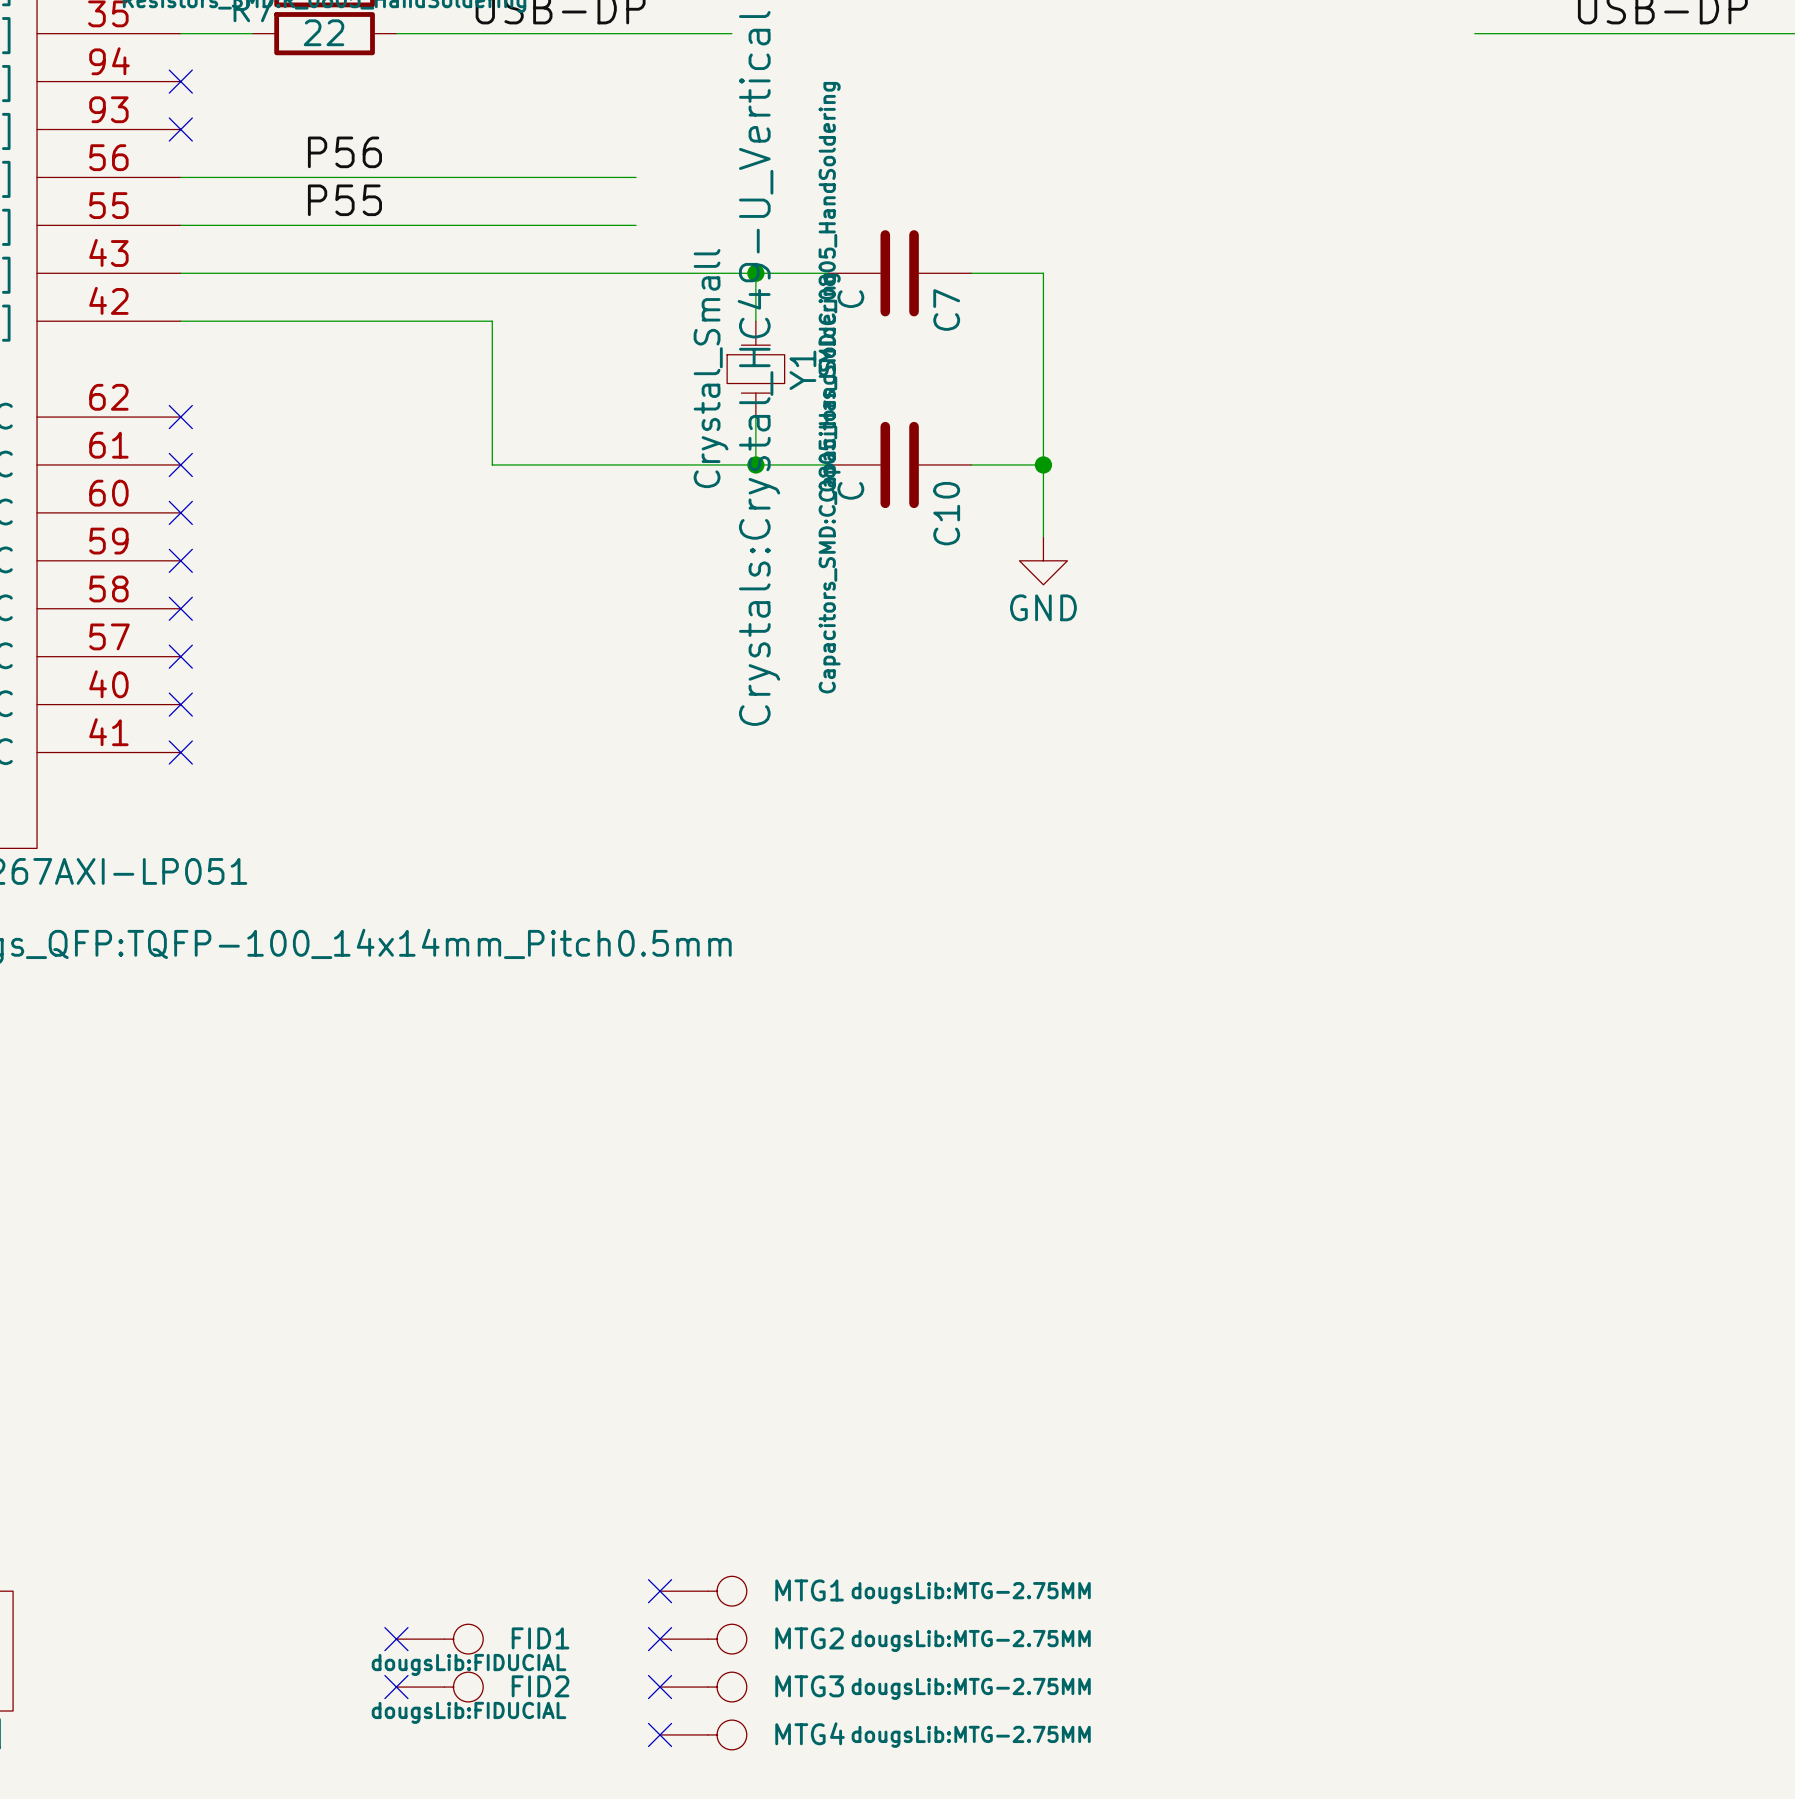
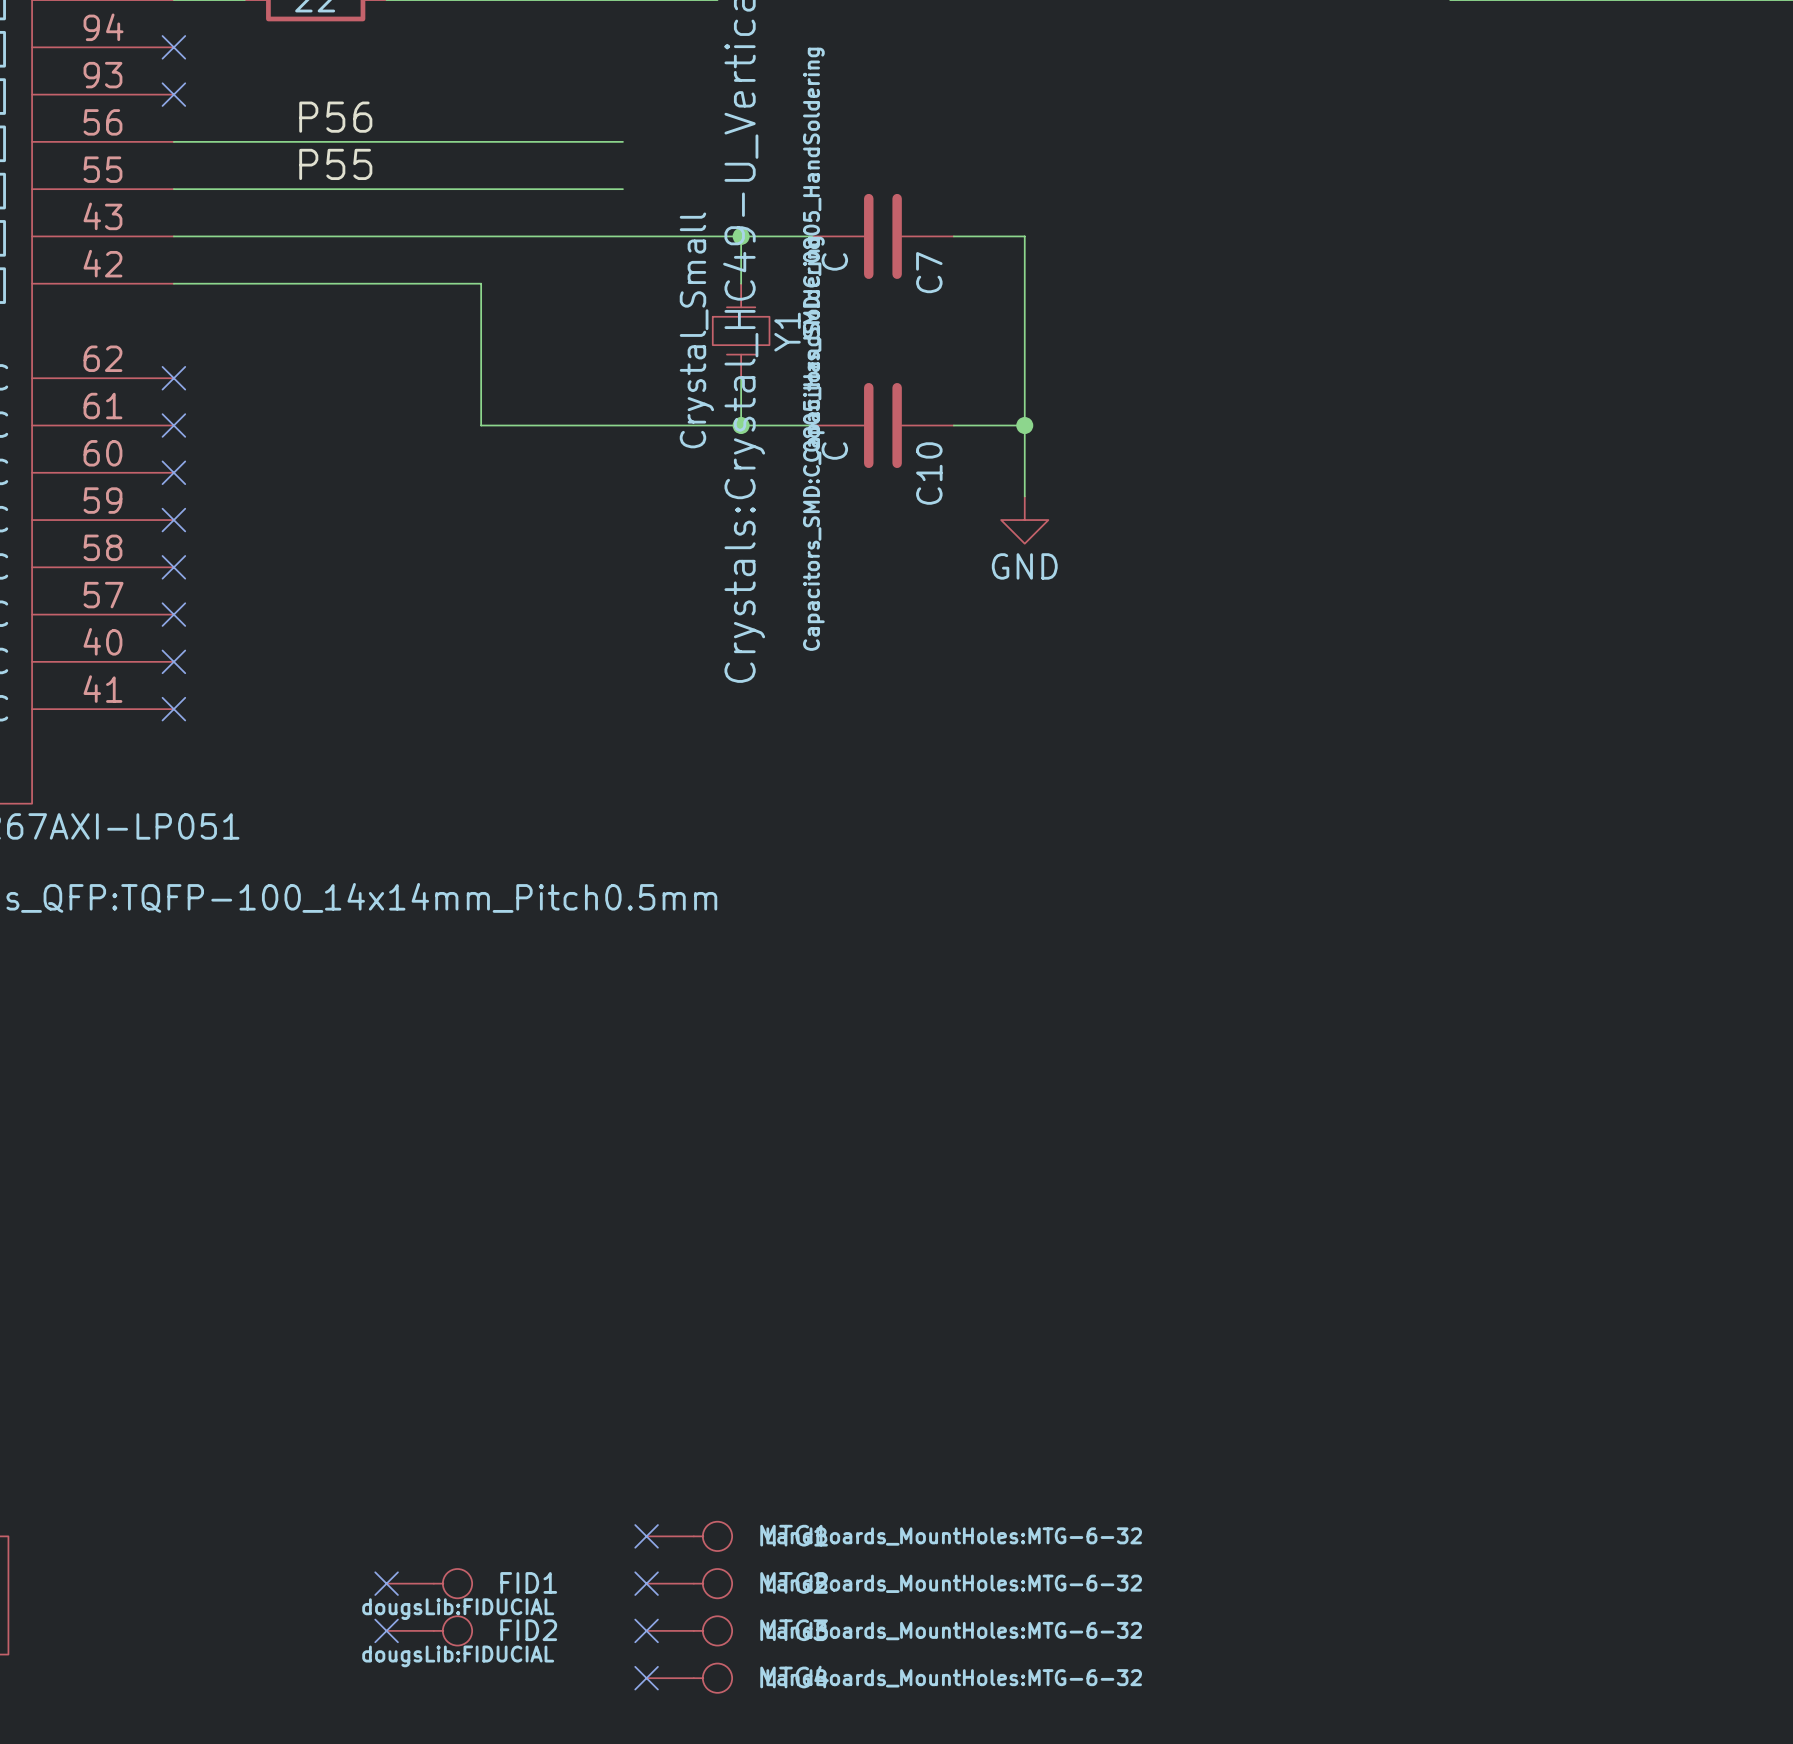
MTG1 text: dougsLib:MTG-2.75MM (971, 1593) -> LandBoards_MountHoles:MTG-6-32 (954, 1536)
MTG2 text: dougsLib:MTG-2.75MM (971, 1640) -> LandBoards_MountHoles:MTG-6-32 (954, 1583)
MTG3 text: dougsLib:MTG-2.75MM (971, 1688) -> LandBoards_MountHoles:MTG-6-32 (954, 1631)
MTG4 text: dougsLib:MTG-2.75MM (971, 1736) -> LandBoards_MountHoles:MTG-6-32 (954, 1678)

